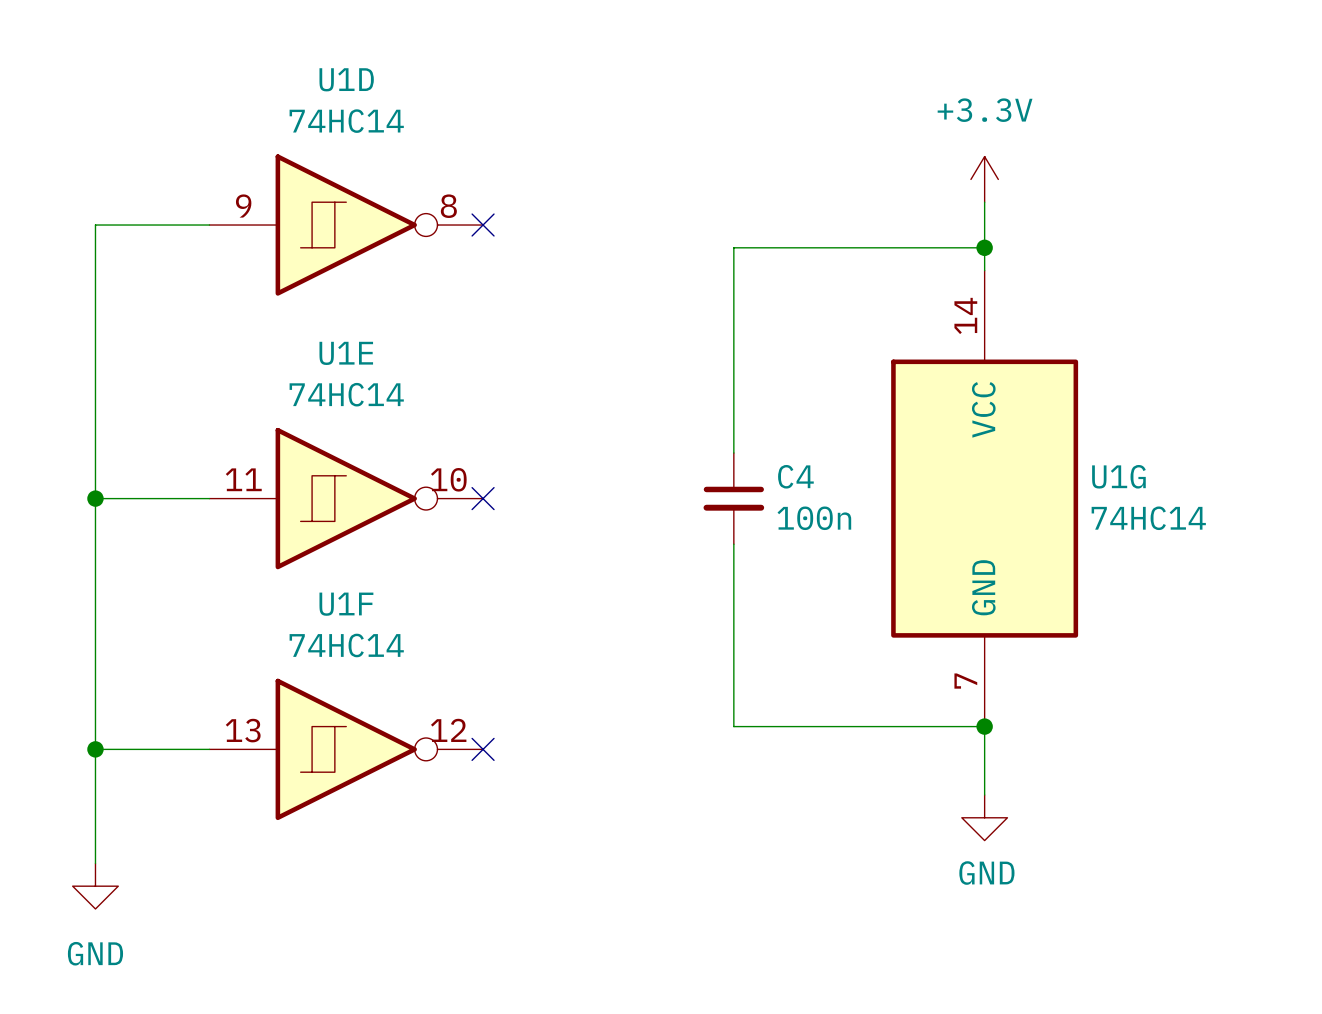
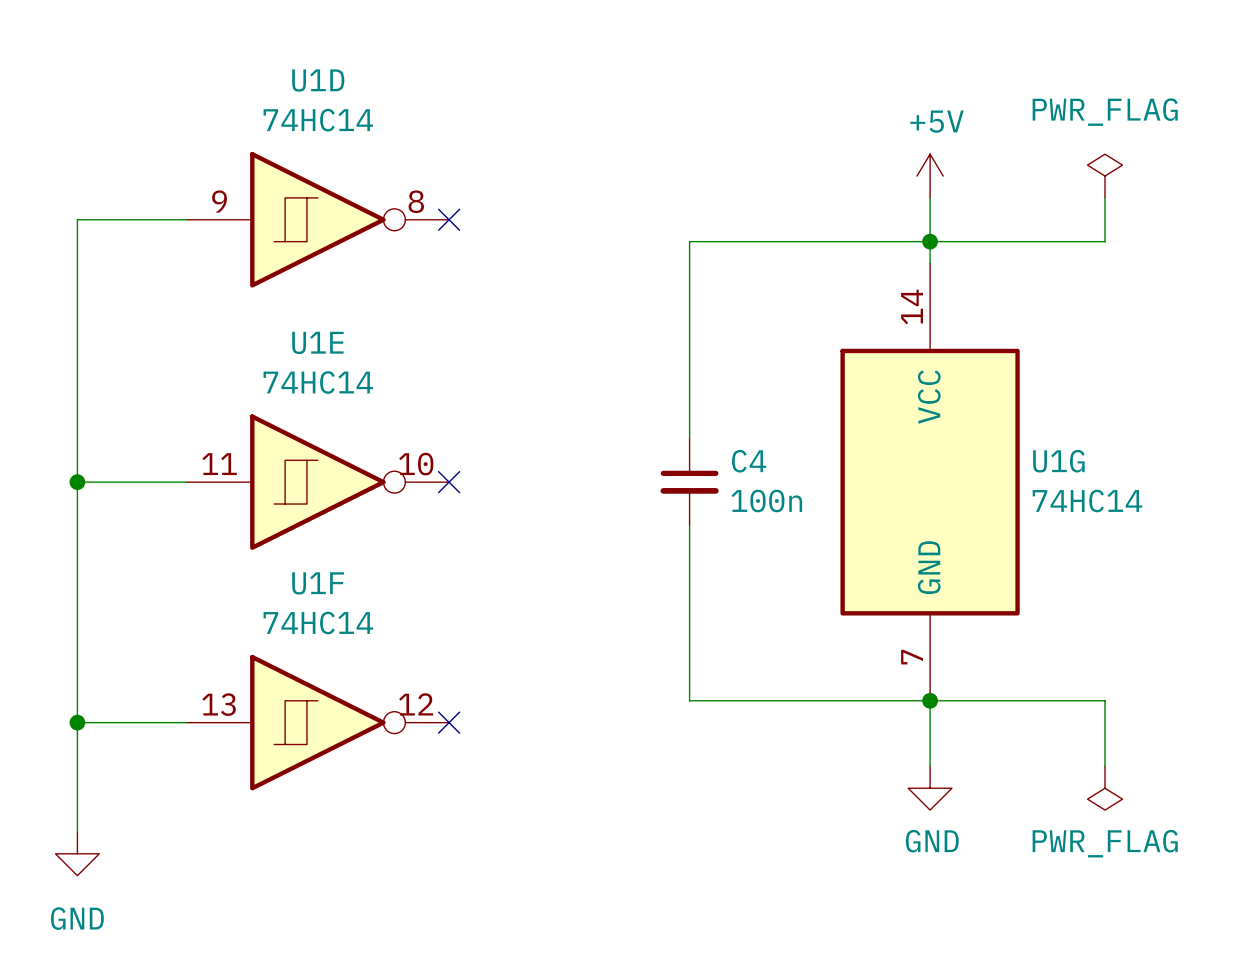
power symbol: +3.3V (984, 179) -> +5V (930, 176)
power symbol: none -> PWR_FLAG (1105, 176)
wire: none -> (1105, 197) (1105, 241) (930, 241)
wire: none -> (930, 700) (1105, 700) (1105, 766)
power symbol: none -> PWR_FLAG (1105, 788)

